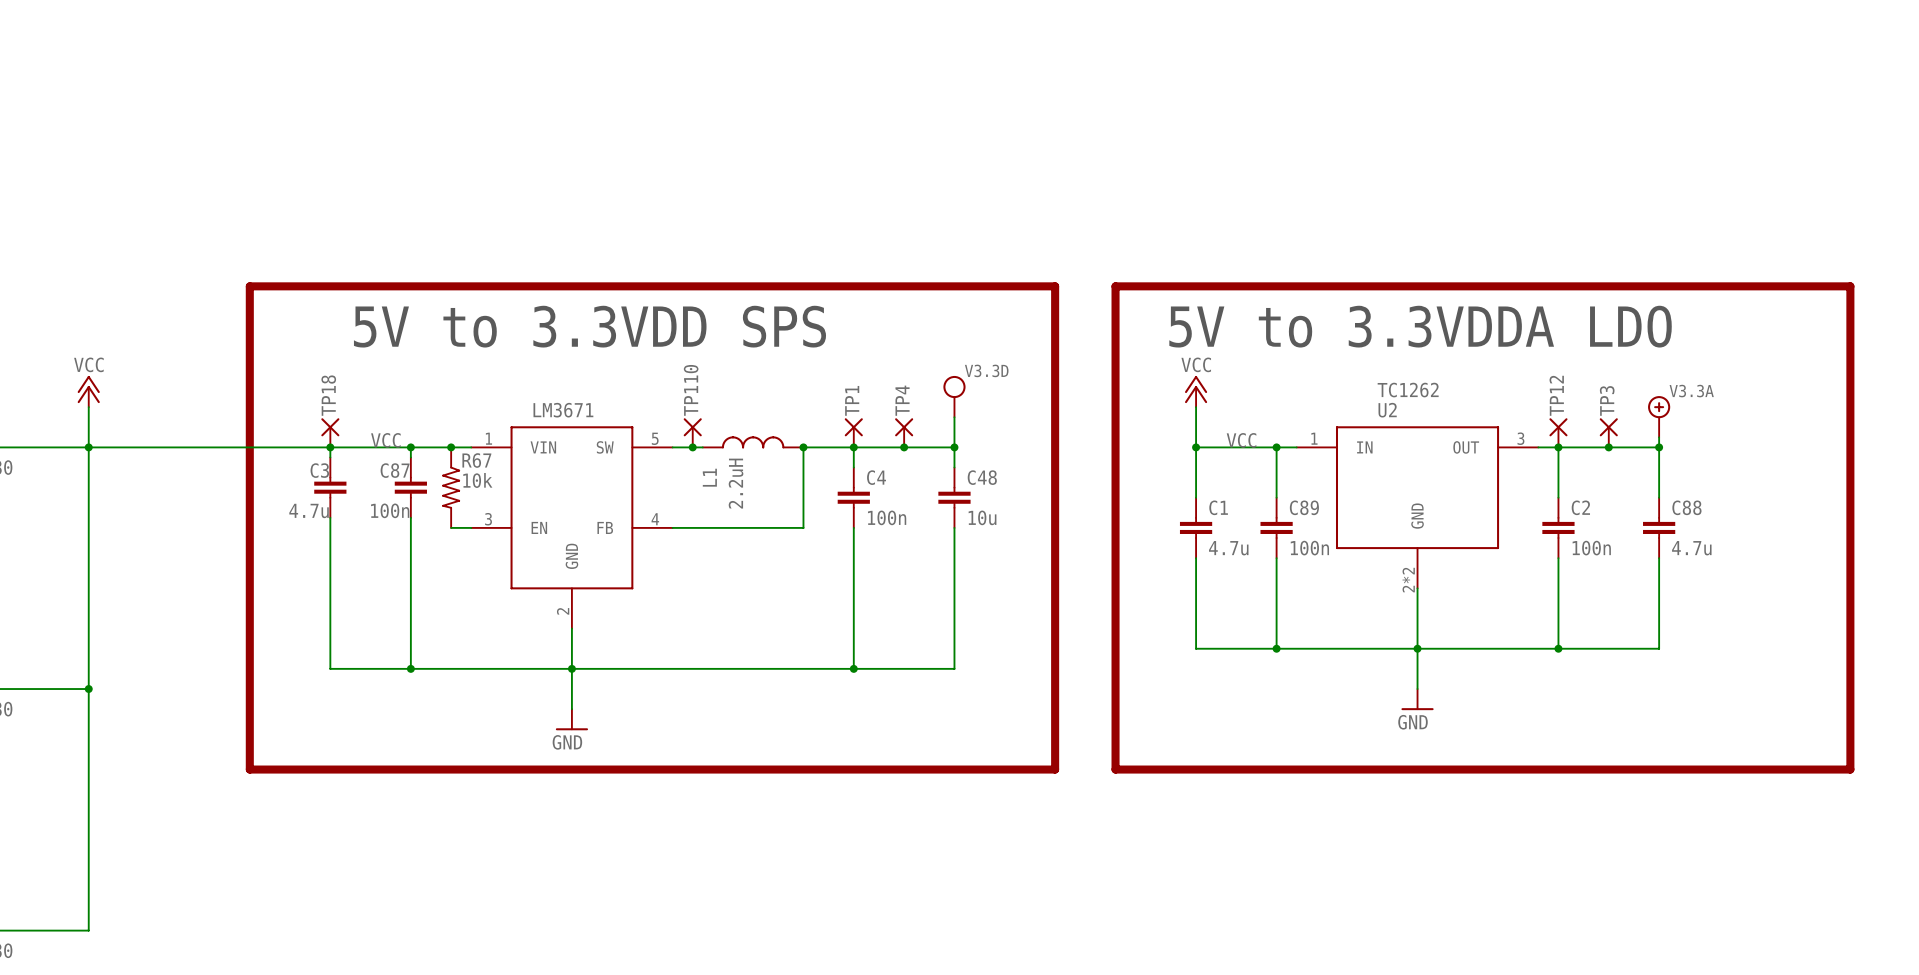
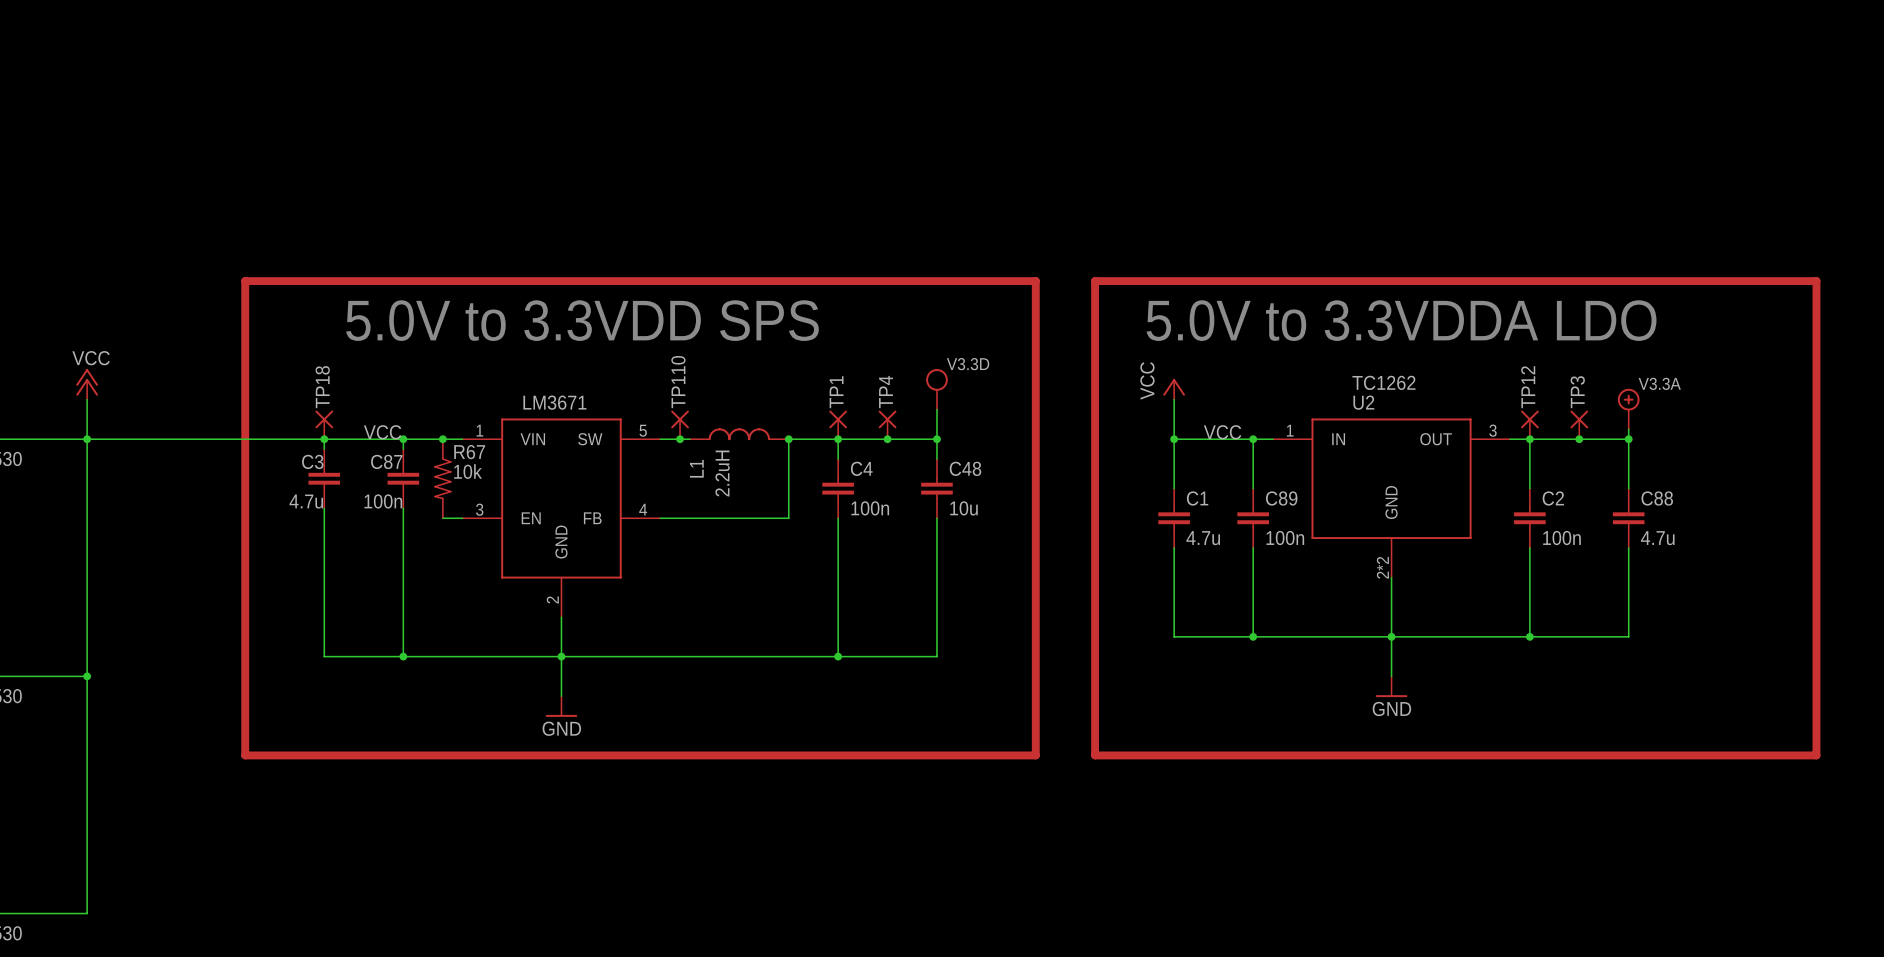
text: 5V to 3.3VDD SPS (589, 326) -> 5.0V to 3.3VDD SPS (582, 320)
text: 5V to 3.3VDDA LDO (1420, 326) -> 5.0V to 3.3VDDA LDO (1401, 320)
power symbol text position: VCC (1196, 364) -> VCC (1147, 380)
power symbol shape: [1184, 375, 1208, 408] -> [1163, 378, 1186, 400]

